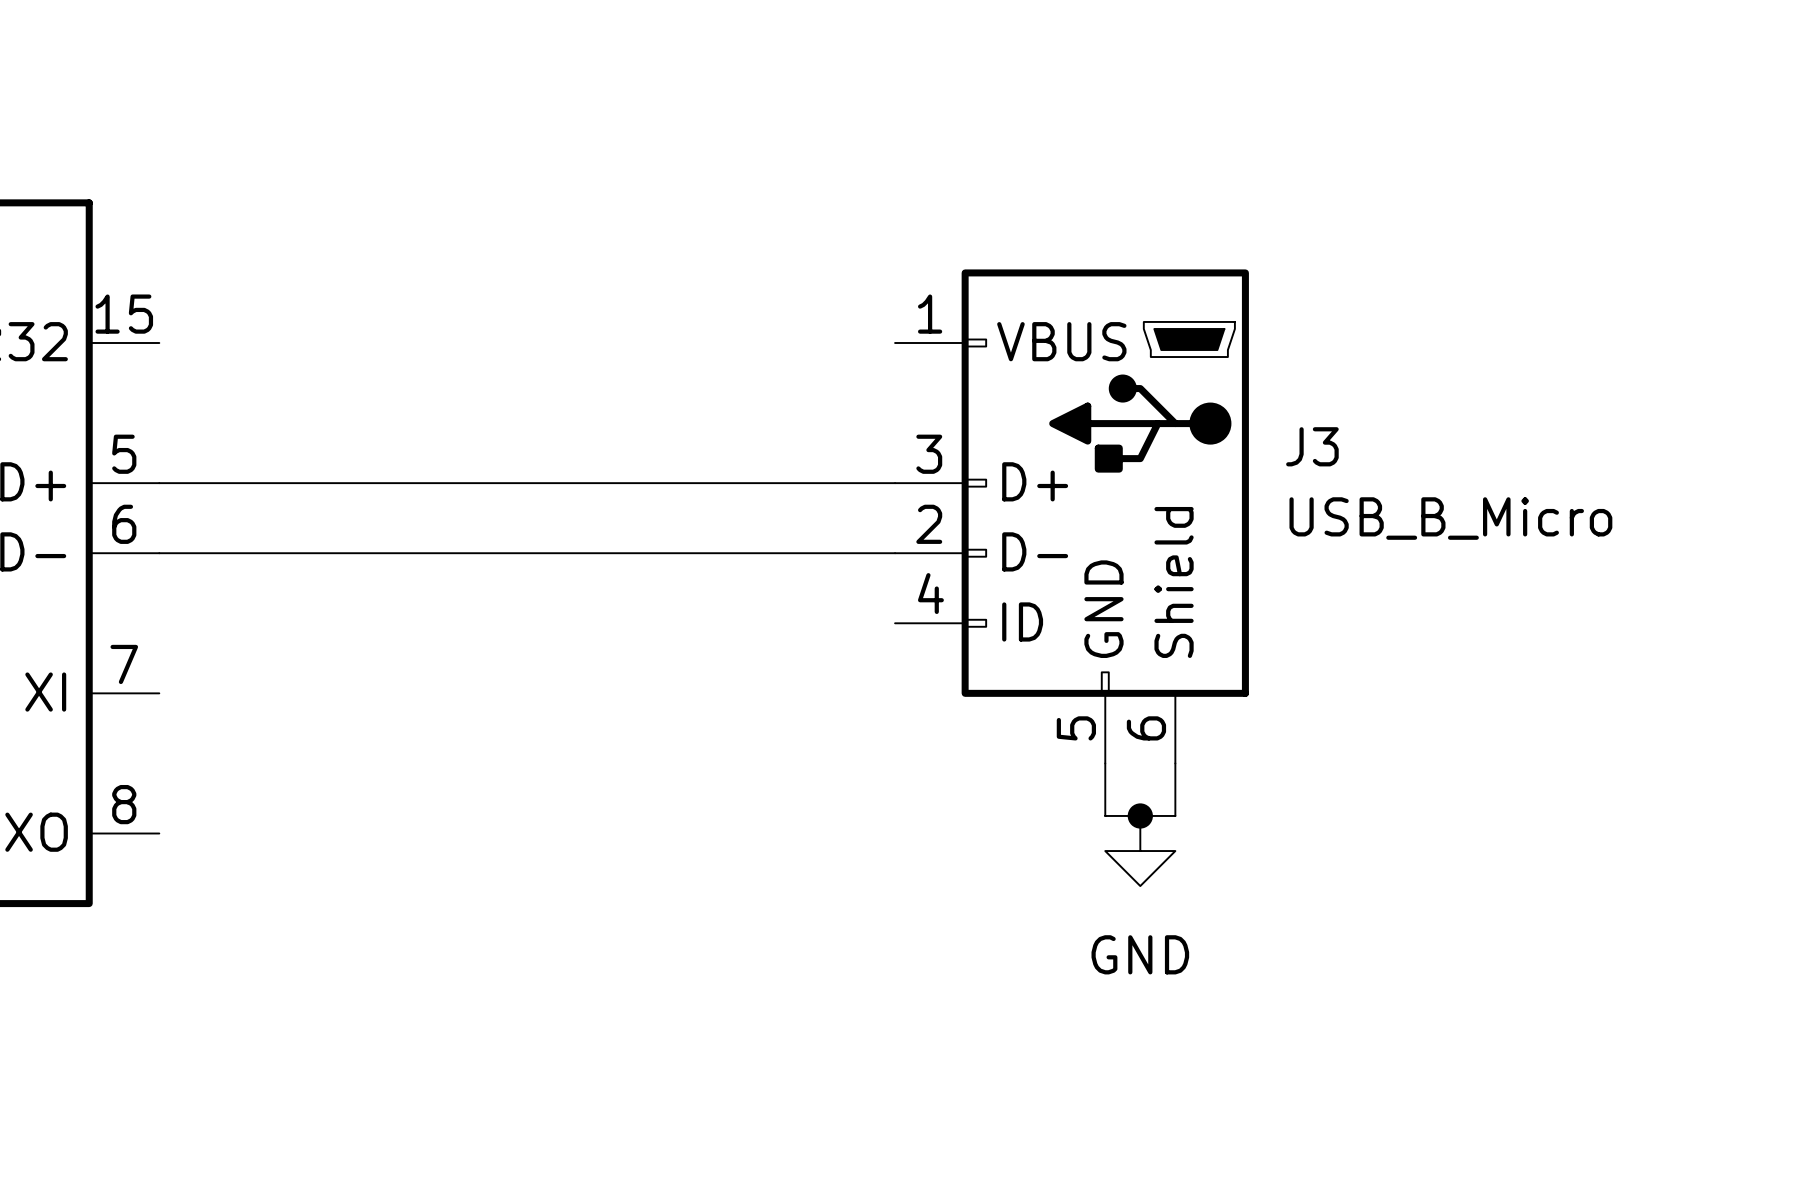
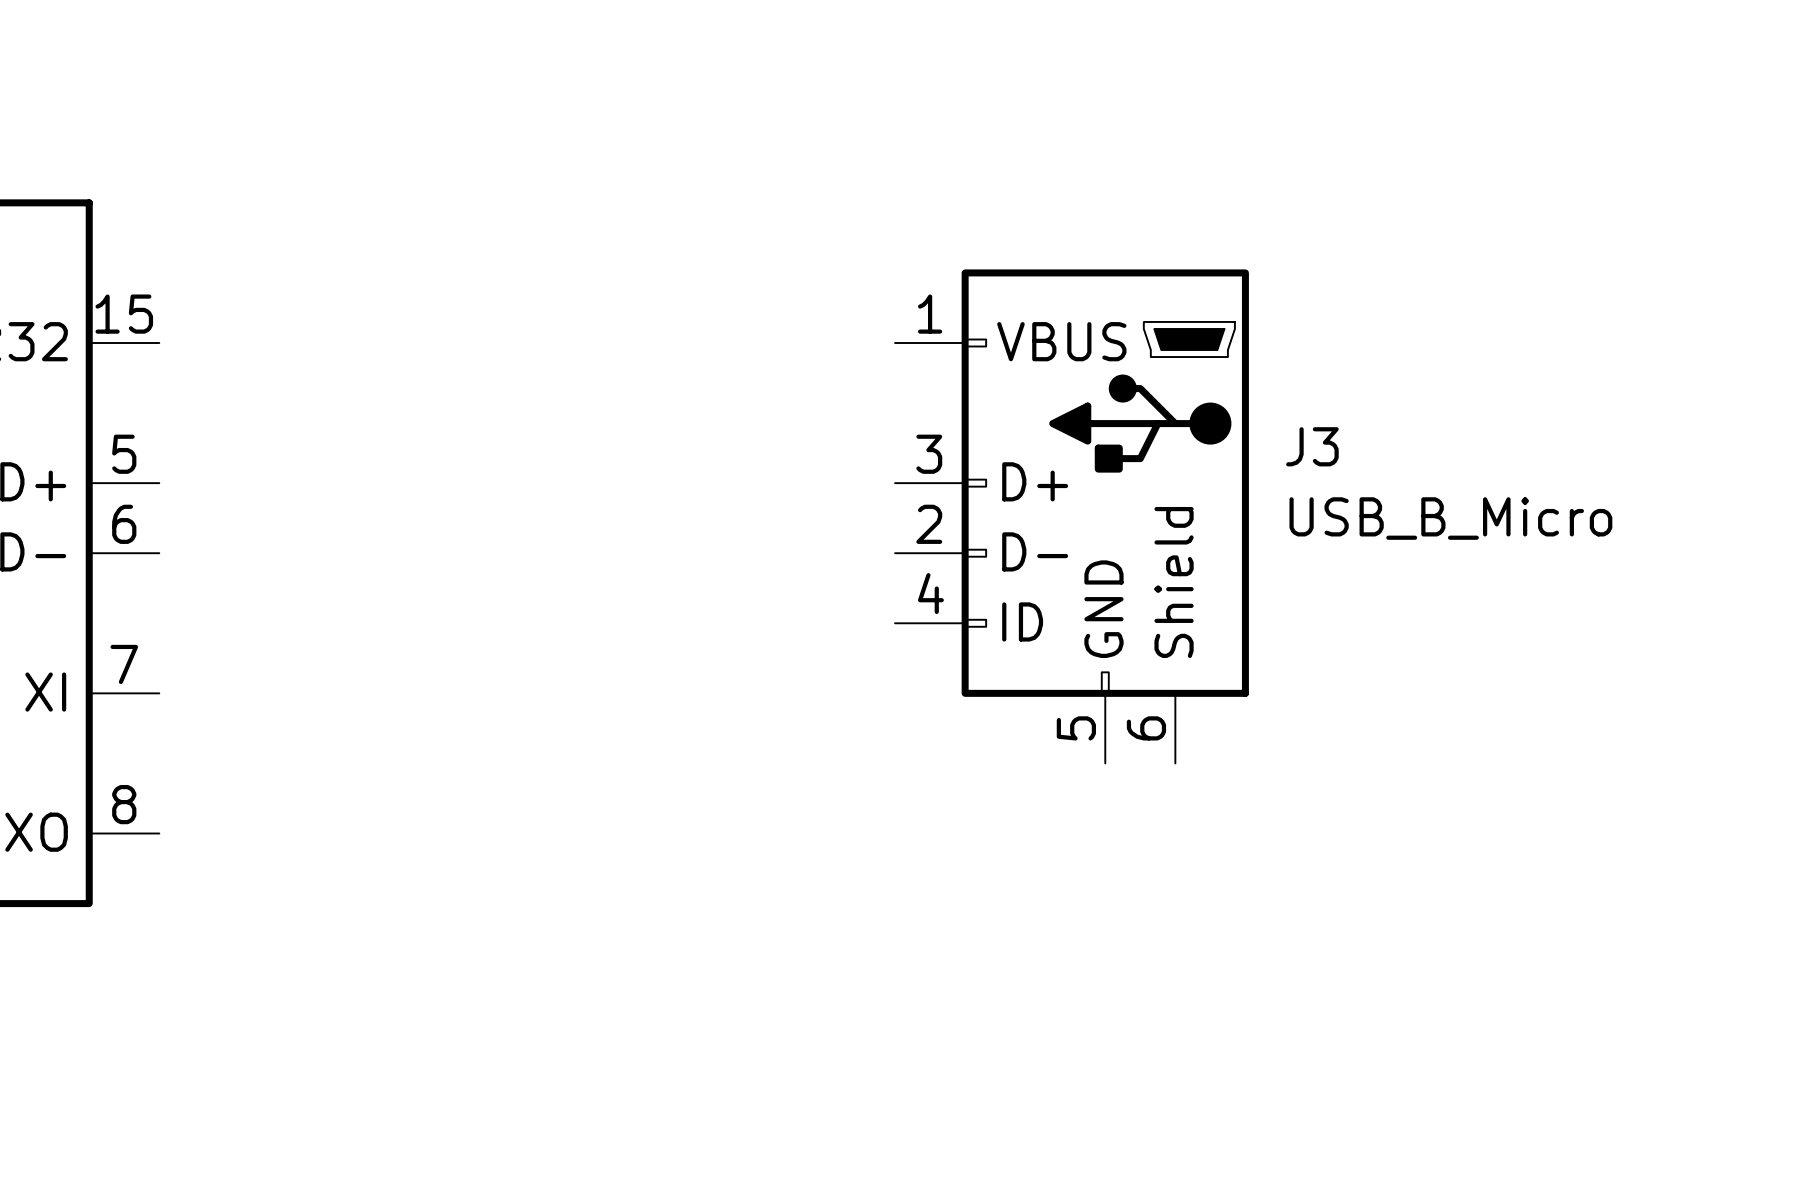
wire: (159, 483) (895, 483) -> none
wire: (159, 553) (895, 553) -> none
wire: (1105, 763) (1105, 815) (1175, 815) (1175, 763) -> none
junction: (1140, 815) -> none
power symbol: GND (1140, 851) -> none

